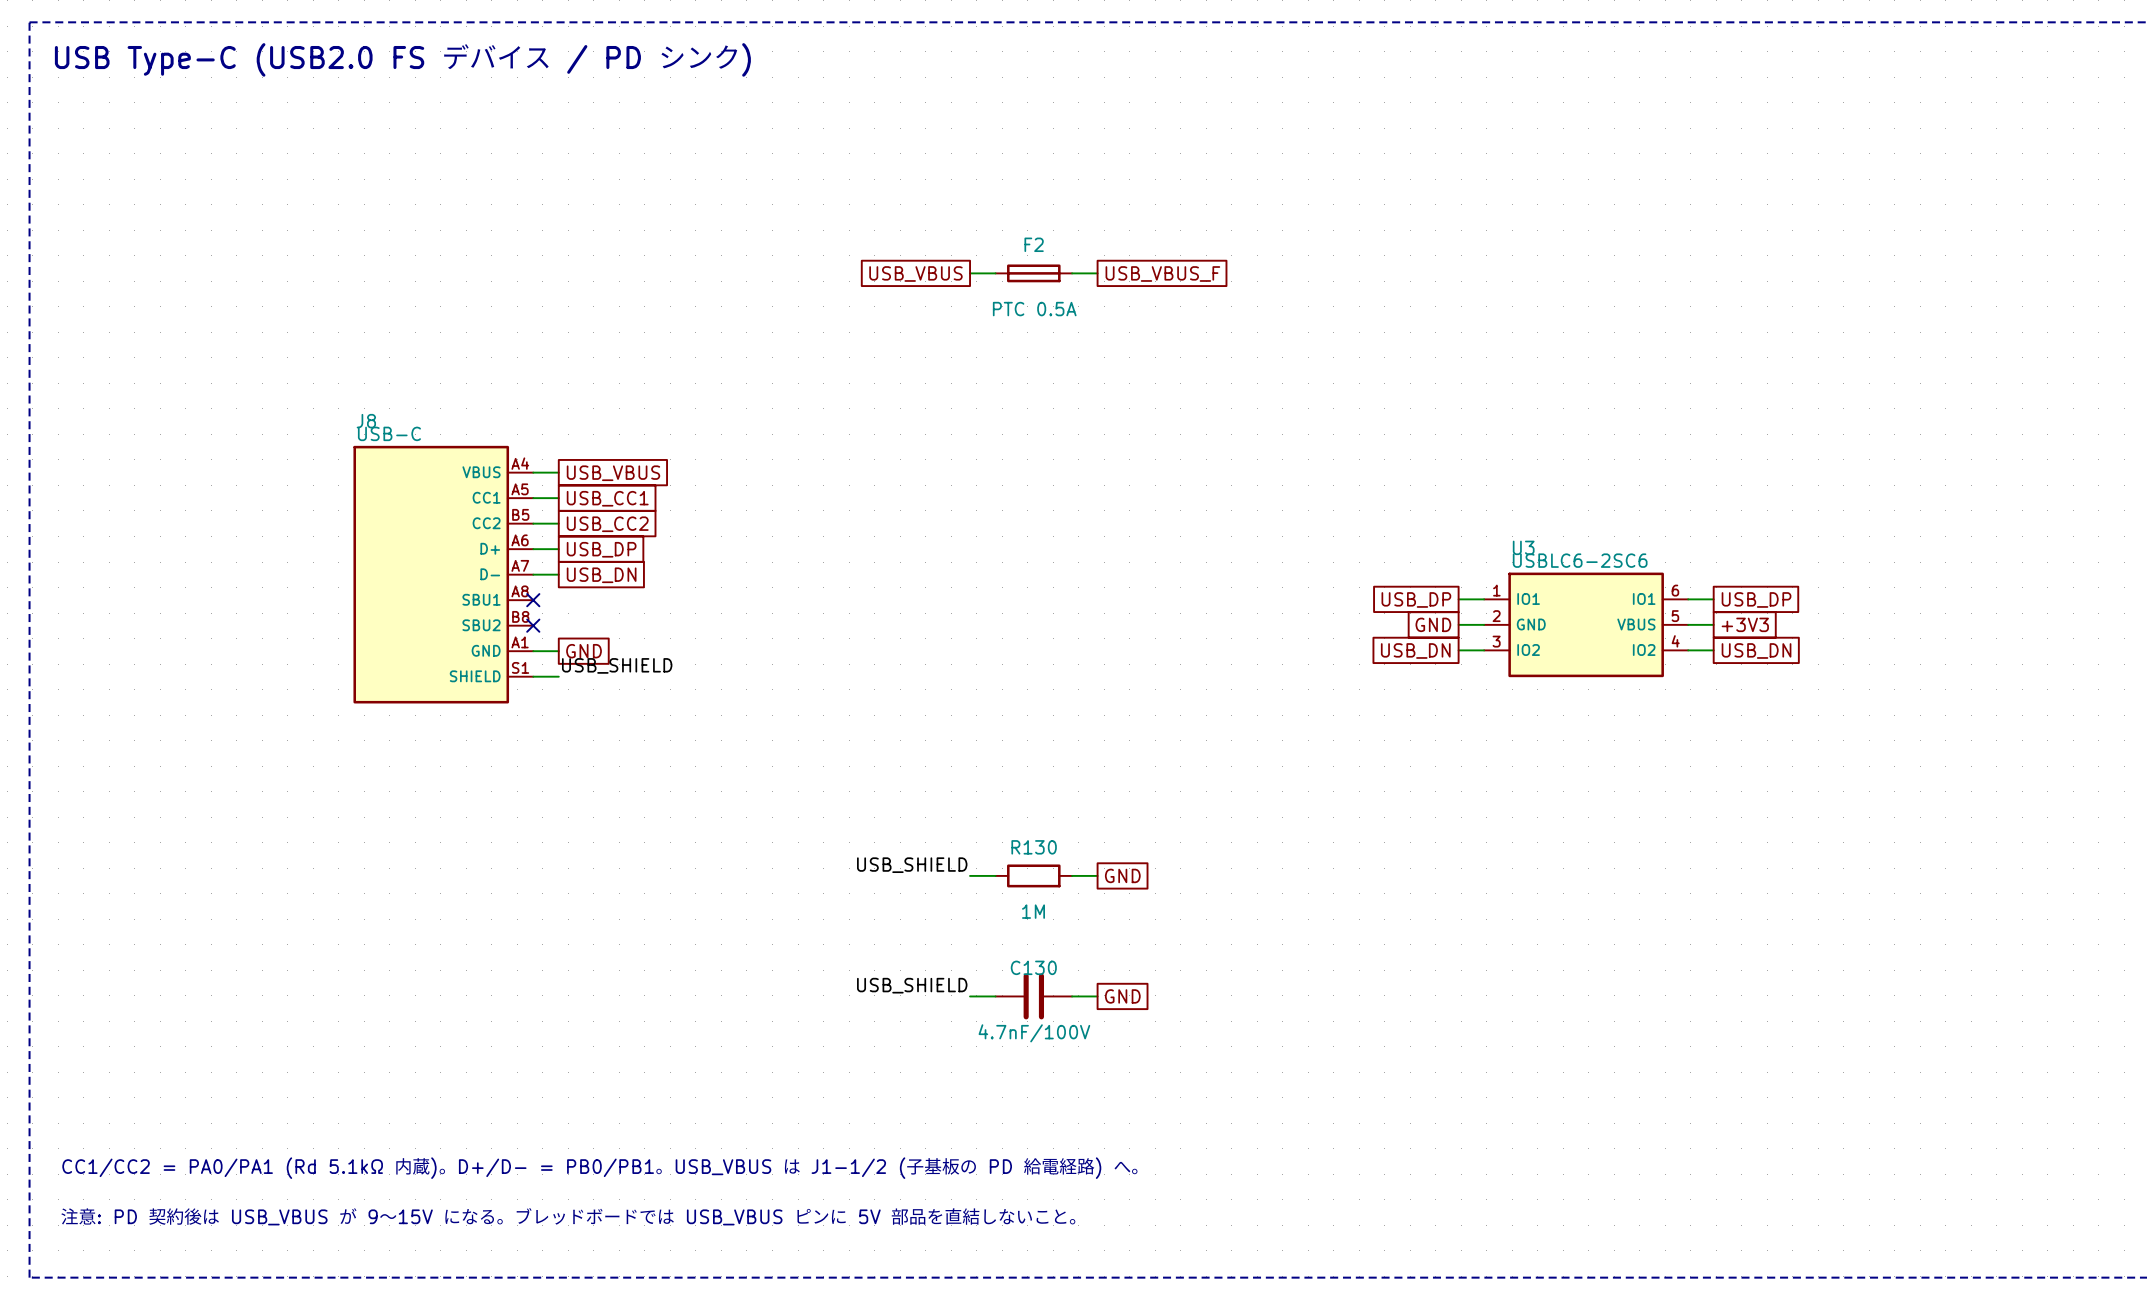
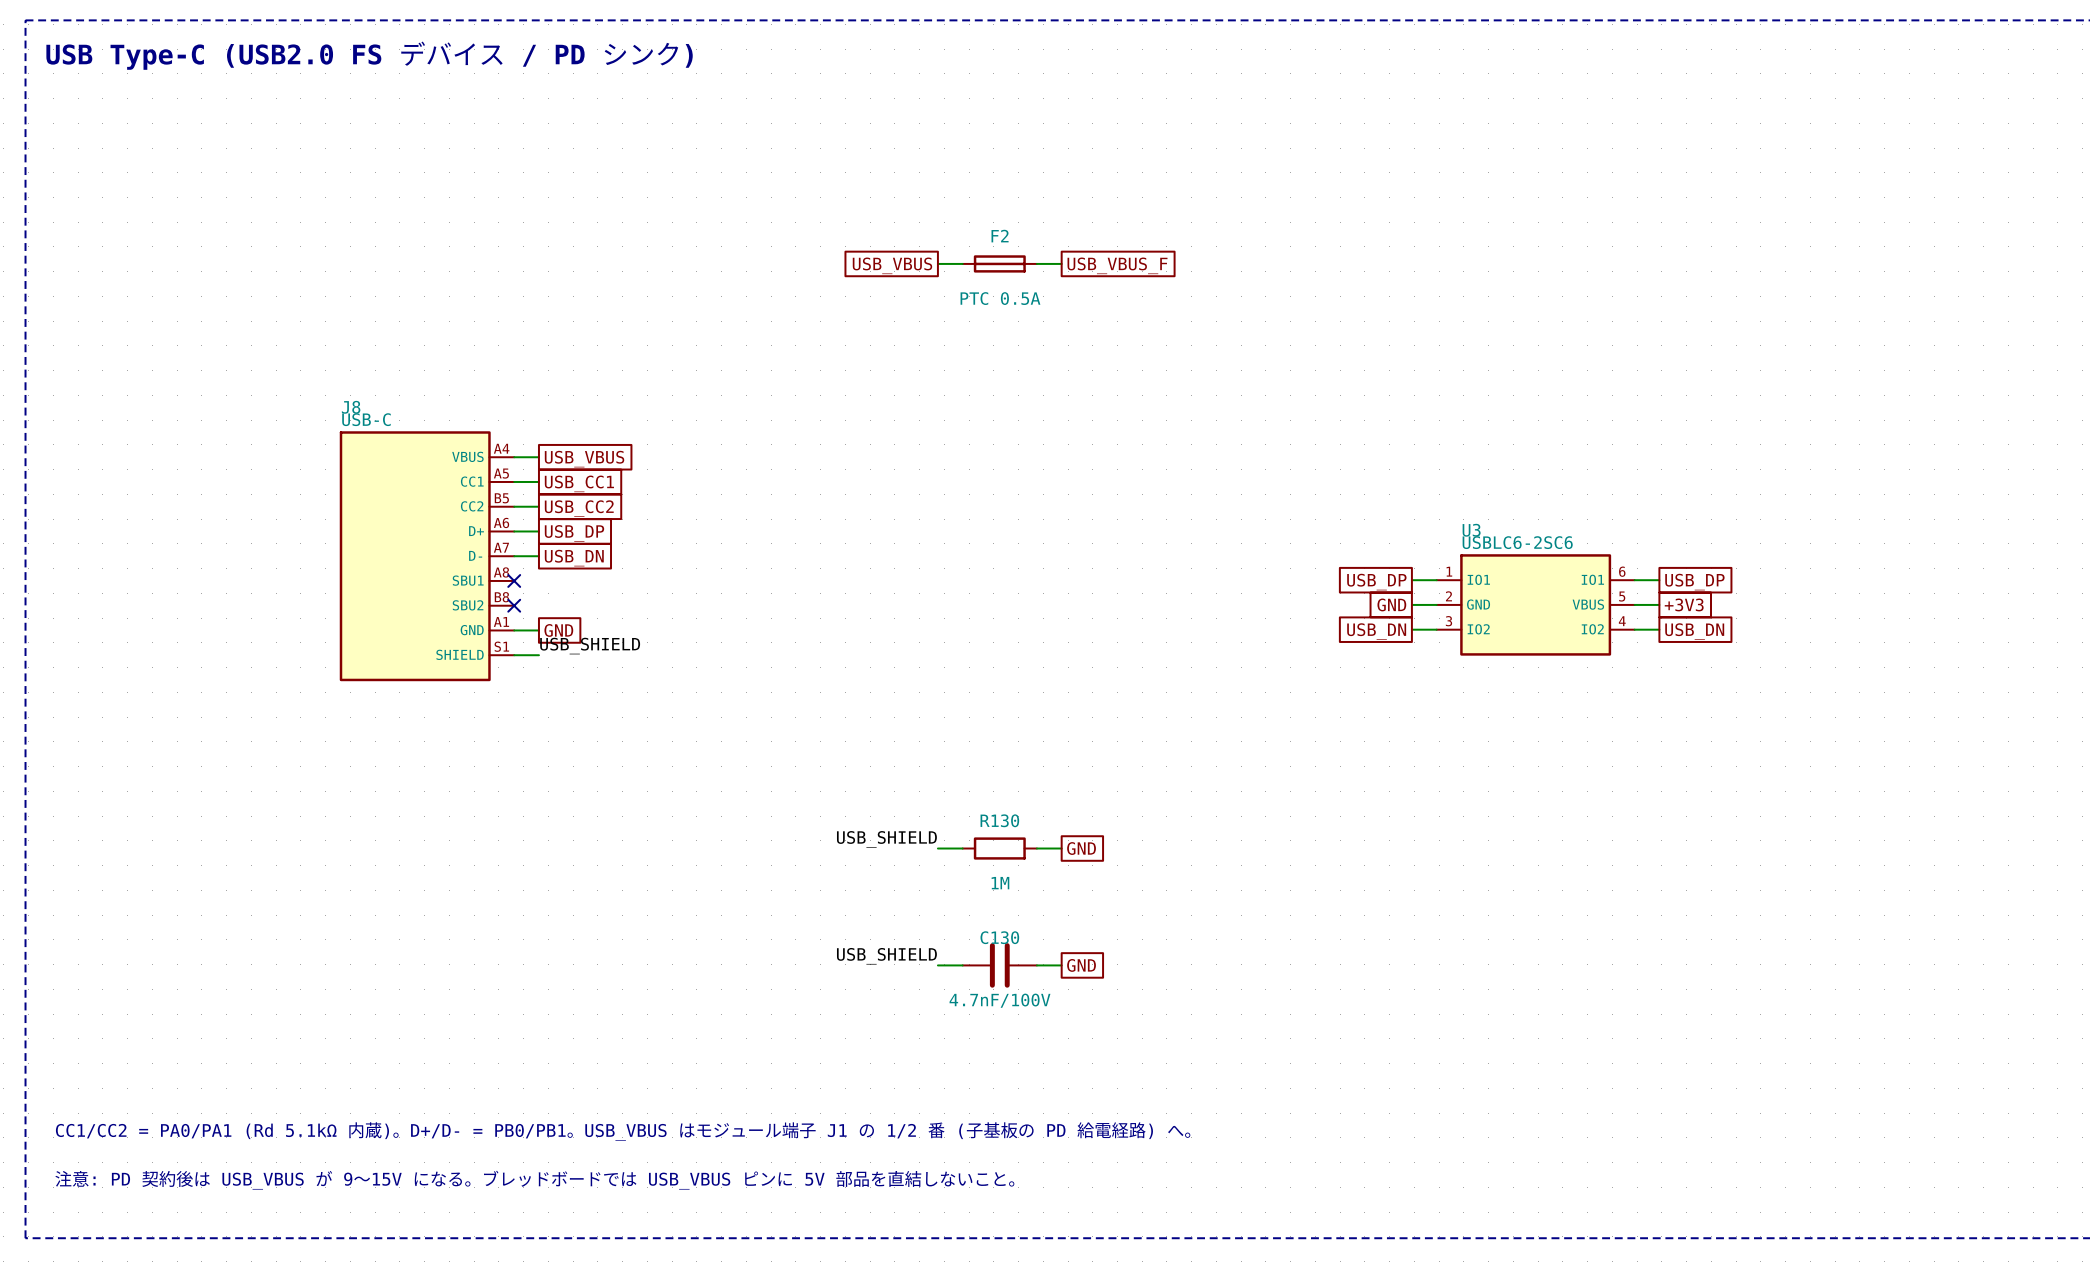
text: CC1/CC2 = PA0/PA1 (Rd 5.1kΩ 内蔵)。D+/D- = PB0/PB1。USB_VBUS は J1-1/2 (子基板の PD 給電経路) へ。 (600, 1168) -> CC1/CC2 = PA0/PA1 (Rd 5.1kΩ 内蔵)。D+/D- = PB0/PB1。USB_VBUS はモジュール端子 J1 の 1/2 番 (子基板の PD 給電経路) へ。 (623, 1131)

